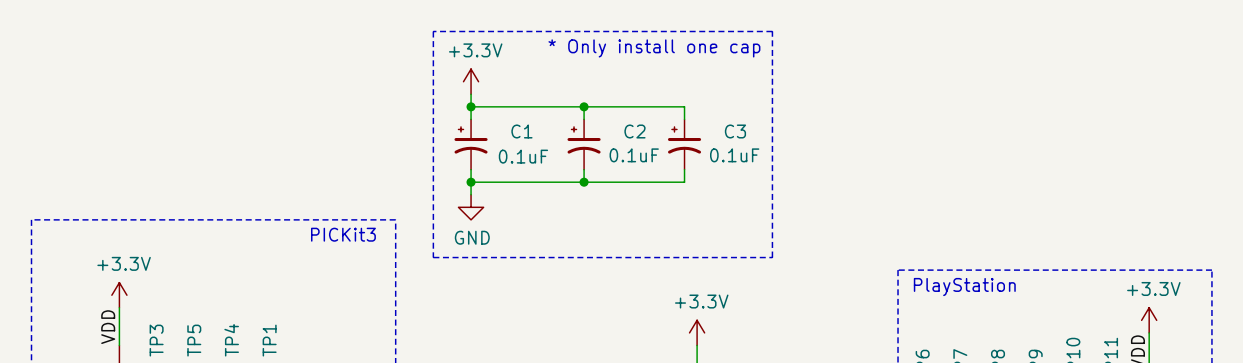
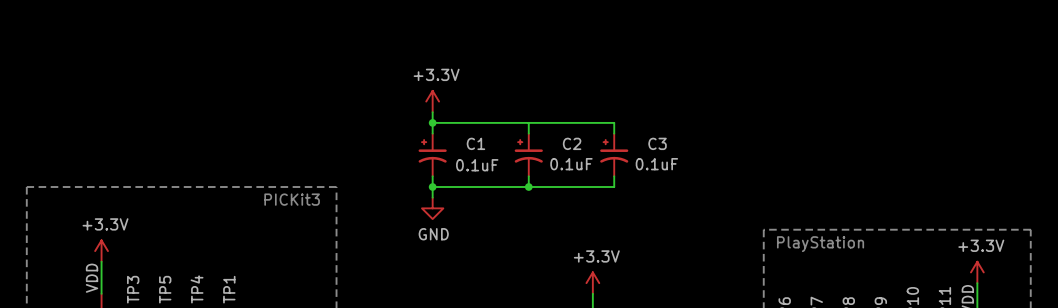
line: (433, 31) (433, 257) (772, 257) (772, 31) (433, 31) -> none
text: * Only install one cap (654, 48) -> none
power symbol position: +3.3V (471, 81) -> +3.3V (432, 101)
wire: (471, 94) (471, 119) -> (432, 112) (432, 133)
wire: (471, 106) (684, 106) (684, 119) -> (432, 122) (614, 122) (614, 133)
junction: (471, 106) -> none
wire: (584, 106) (584, 119) -> (528, 122) (528, 133)
junction: (584, 106) -> none
C1 position: (471, 144) -> (432, 154)
junction: none -> (432, 122)
C2 position: (584, 144) -> (528, 154)
C3 position: (684, 144) -> (614, 154)
wire: (471, 169) (471, 194) -> (432, 176) (432, 197)
wire: (584, 169) (584, 182) -> (528, 176) (528, 187)
wire: (684, 169) (684, 182) (471, 182) -> (614, 176) (614, 187) (432, 187)
junction: (471, 182) -> none
junction: (584, 182) -> none
power symbol position: GND (471, 207) -> GND (432, 208)
junction: none -> (432, 187)
junction: none -> (528, 187)

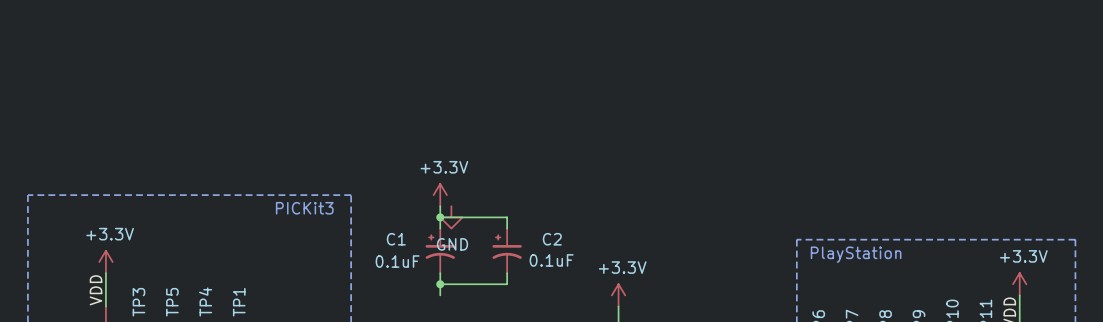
power symbol position: +3.3V (432, 101) -> +3.3V (440, 195)
wire: (432, 112) (432, 133) -> (440, 206) (440, 228)
wire: (432, 122) (614, 122) (614, 133) -> none
junction: (432, 122) -> none
wire: (528, 122) (528, 133) -> none
C1 name position: C1 (475, 143) -> C1 (396, 239)
C1 position: (432, 154) -> (440, 250)
C2 position: (528, 154) -> (507, 250)
C3: 0.1uF (614, 154) -> none
C1 value position: 0.1uF (477, 165) -> 0.1uF (397, 261)
wire: (432, 176) (432, 197) -> (440, 273) (440, 295)
wire: (528, 176) (528, 187) -> none
wire: (614, 176) (614, 187) (432, 187) -> none
junction position: (432, 187) -> (440, 217)
junction: (528, 187) -> none
wire: none -> (440, 217) (507, 217) (507, 228)
wire: none -> (507, 273) (507, 284) (440, 284)
junction: none -> (440, 284)

